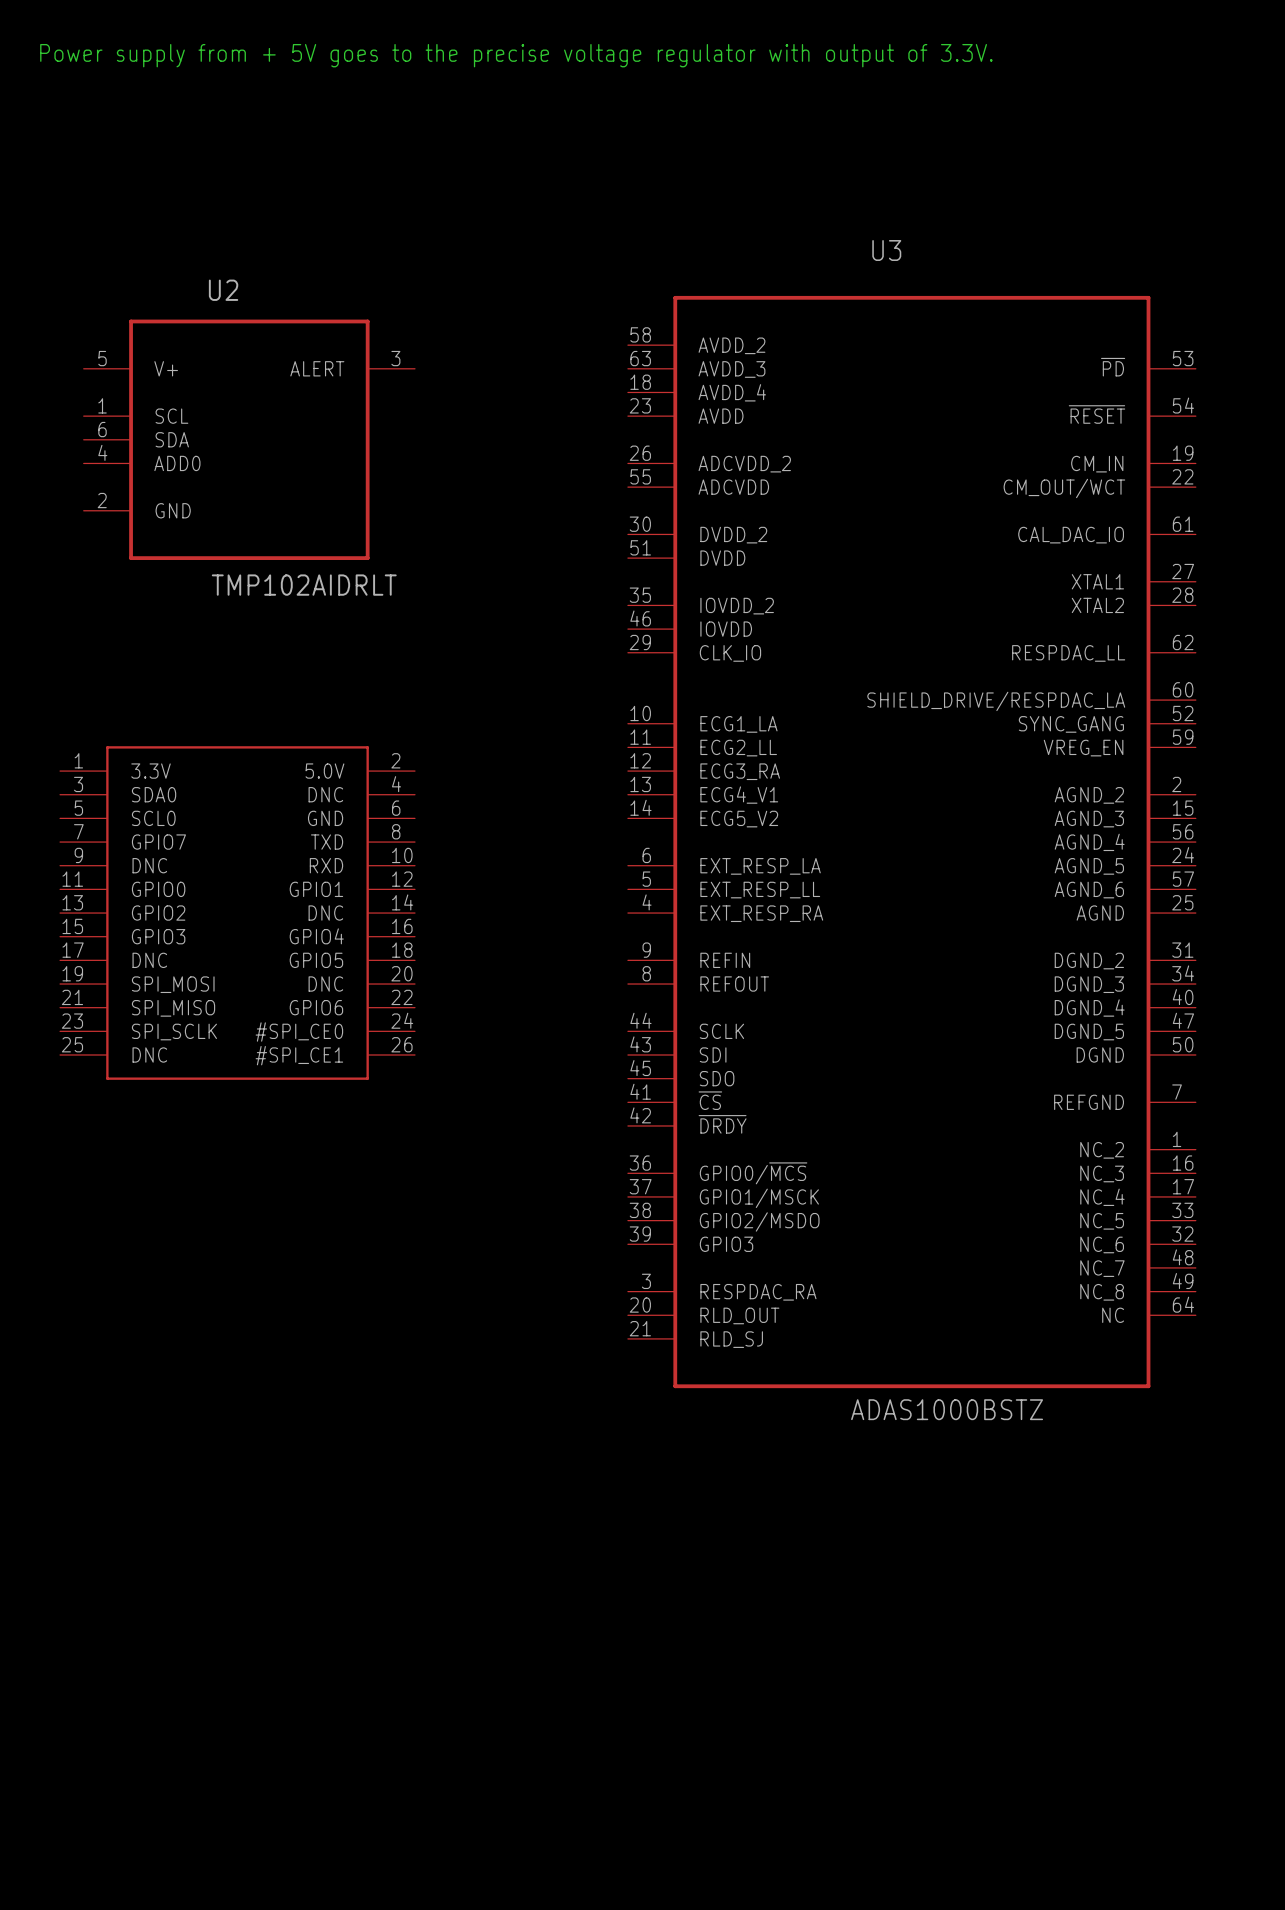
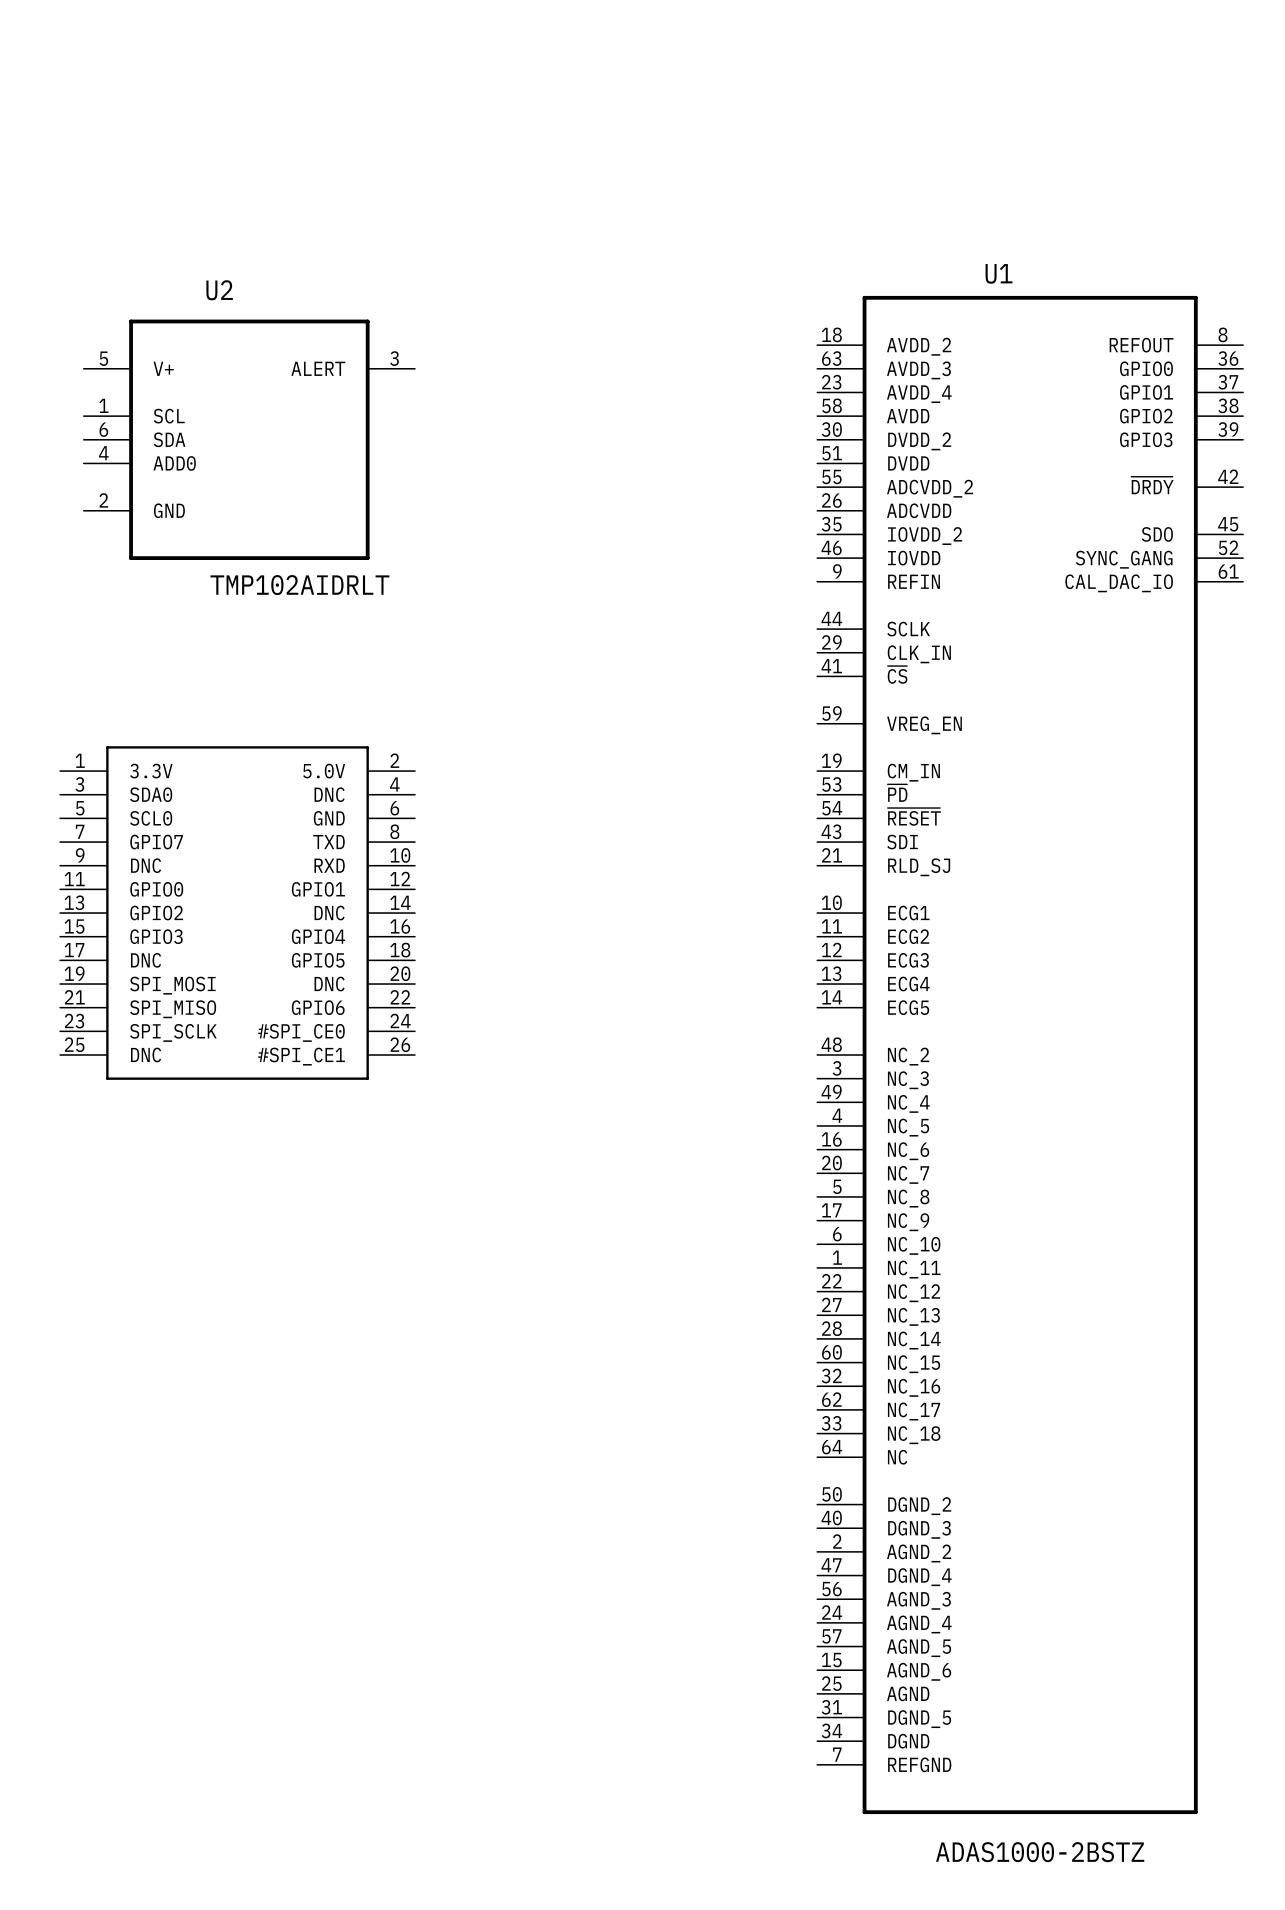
text: Power supply from + 5V goes to the precise voltage regulator with output of 3.3V. (516, 55) -> none
U3: ADAS1000BSTZ (911, 842) -> none
U1: none -> ADAS1000-2BSTZ (1030, 1054)

